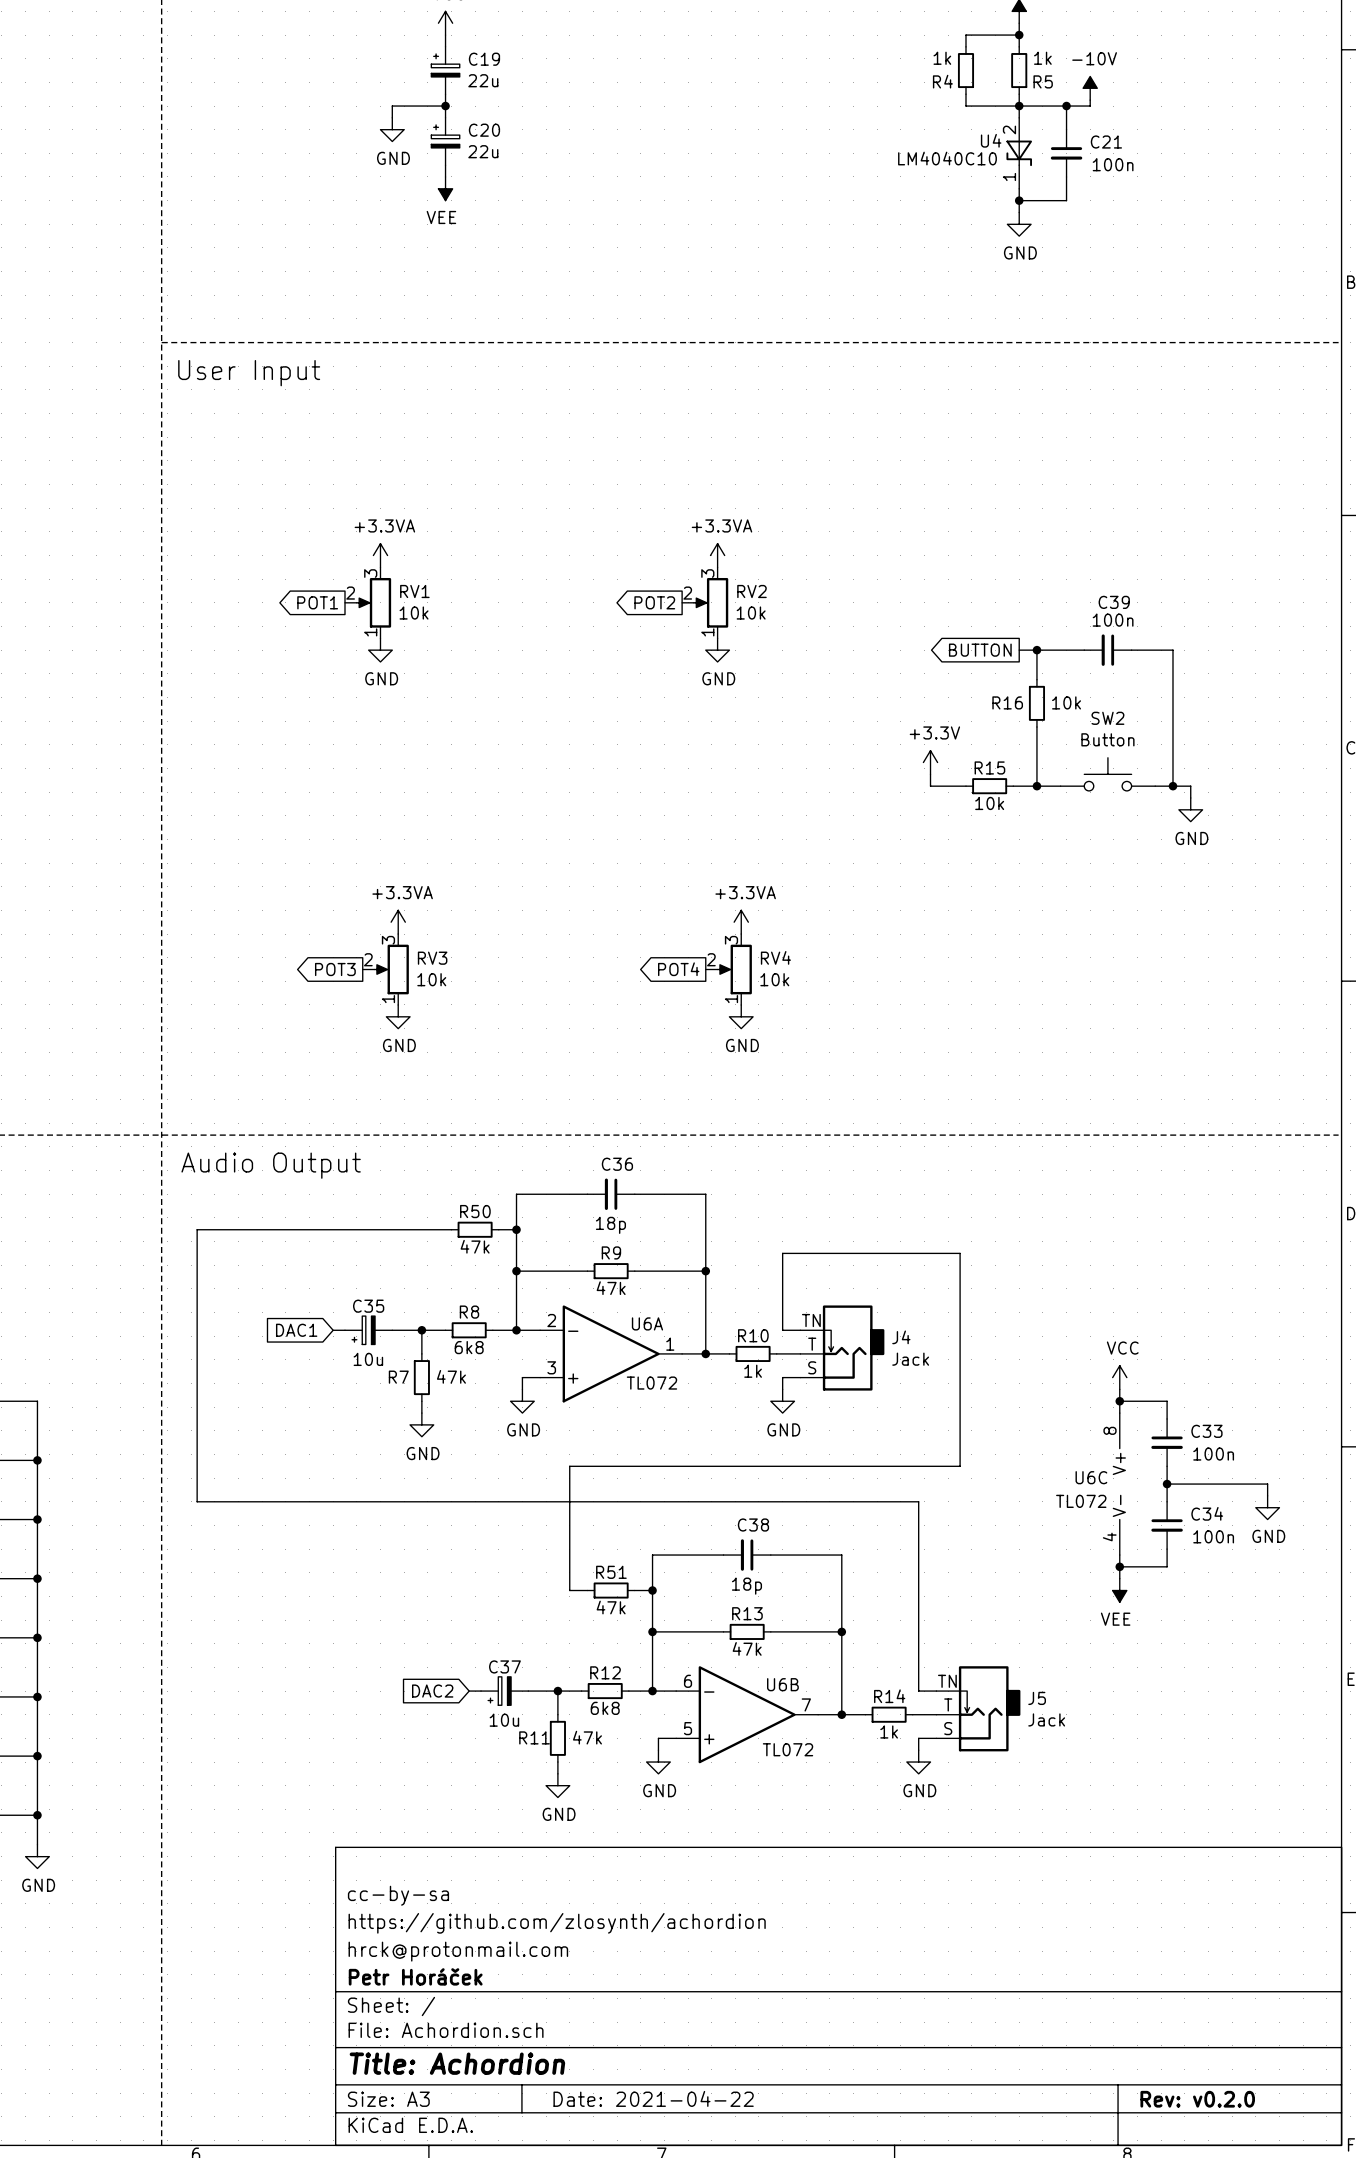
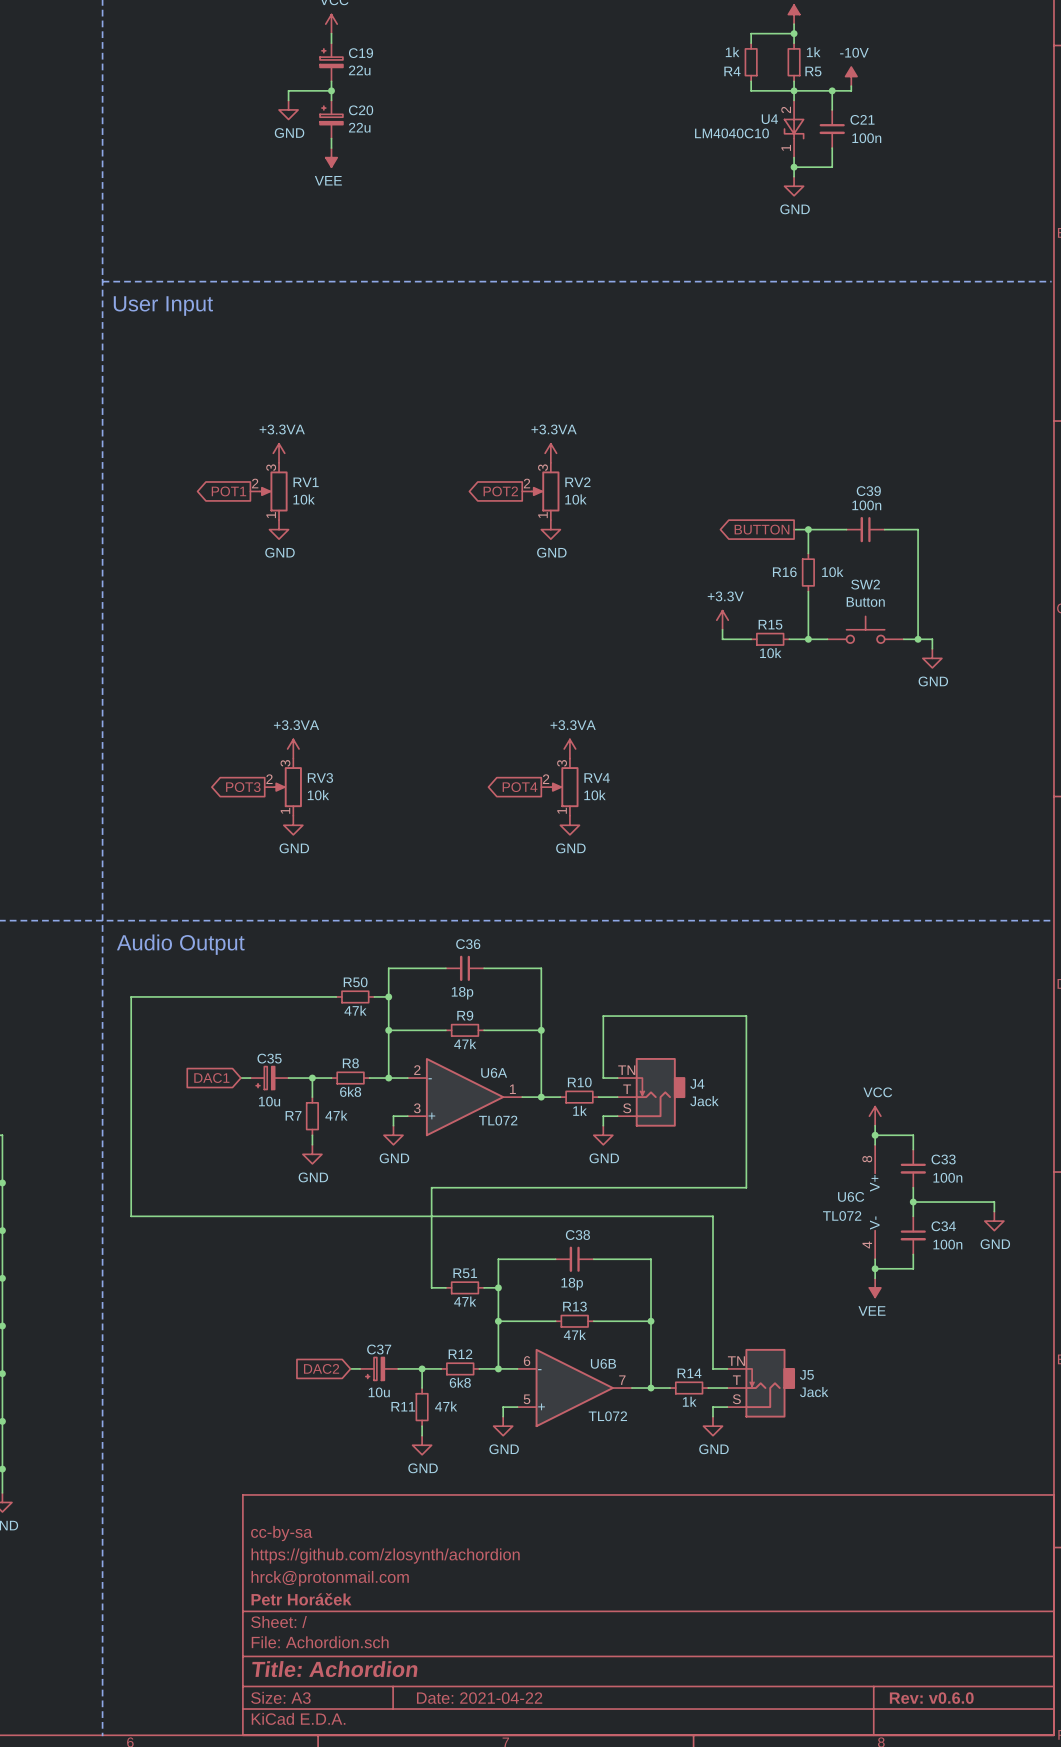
title block: Rev: v0.2.0 (1197, 2099) -> Rev: v0.6.0 (931, 1698)

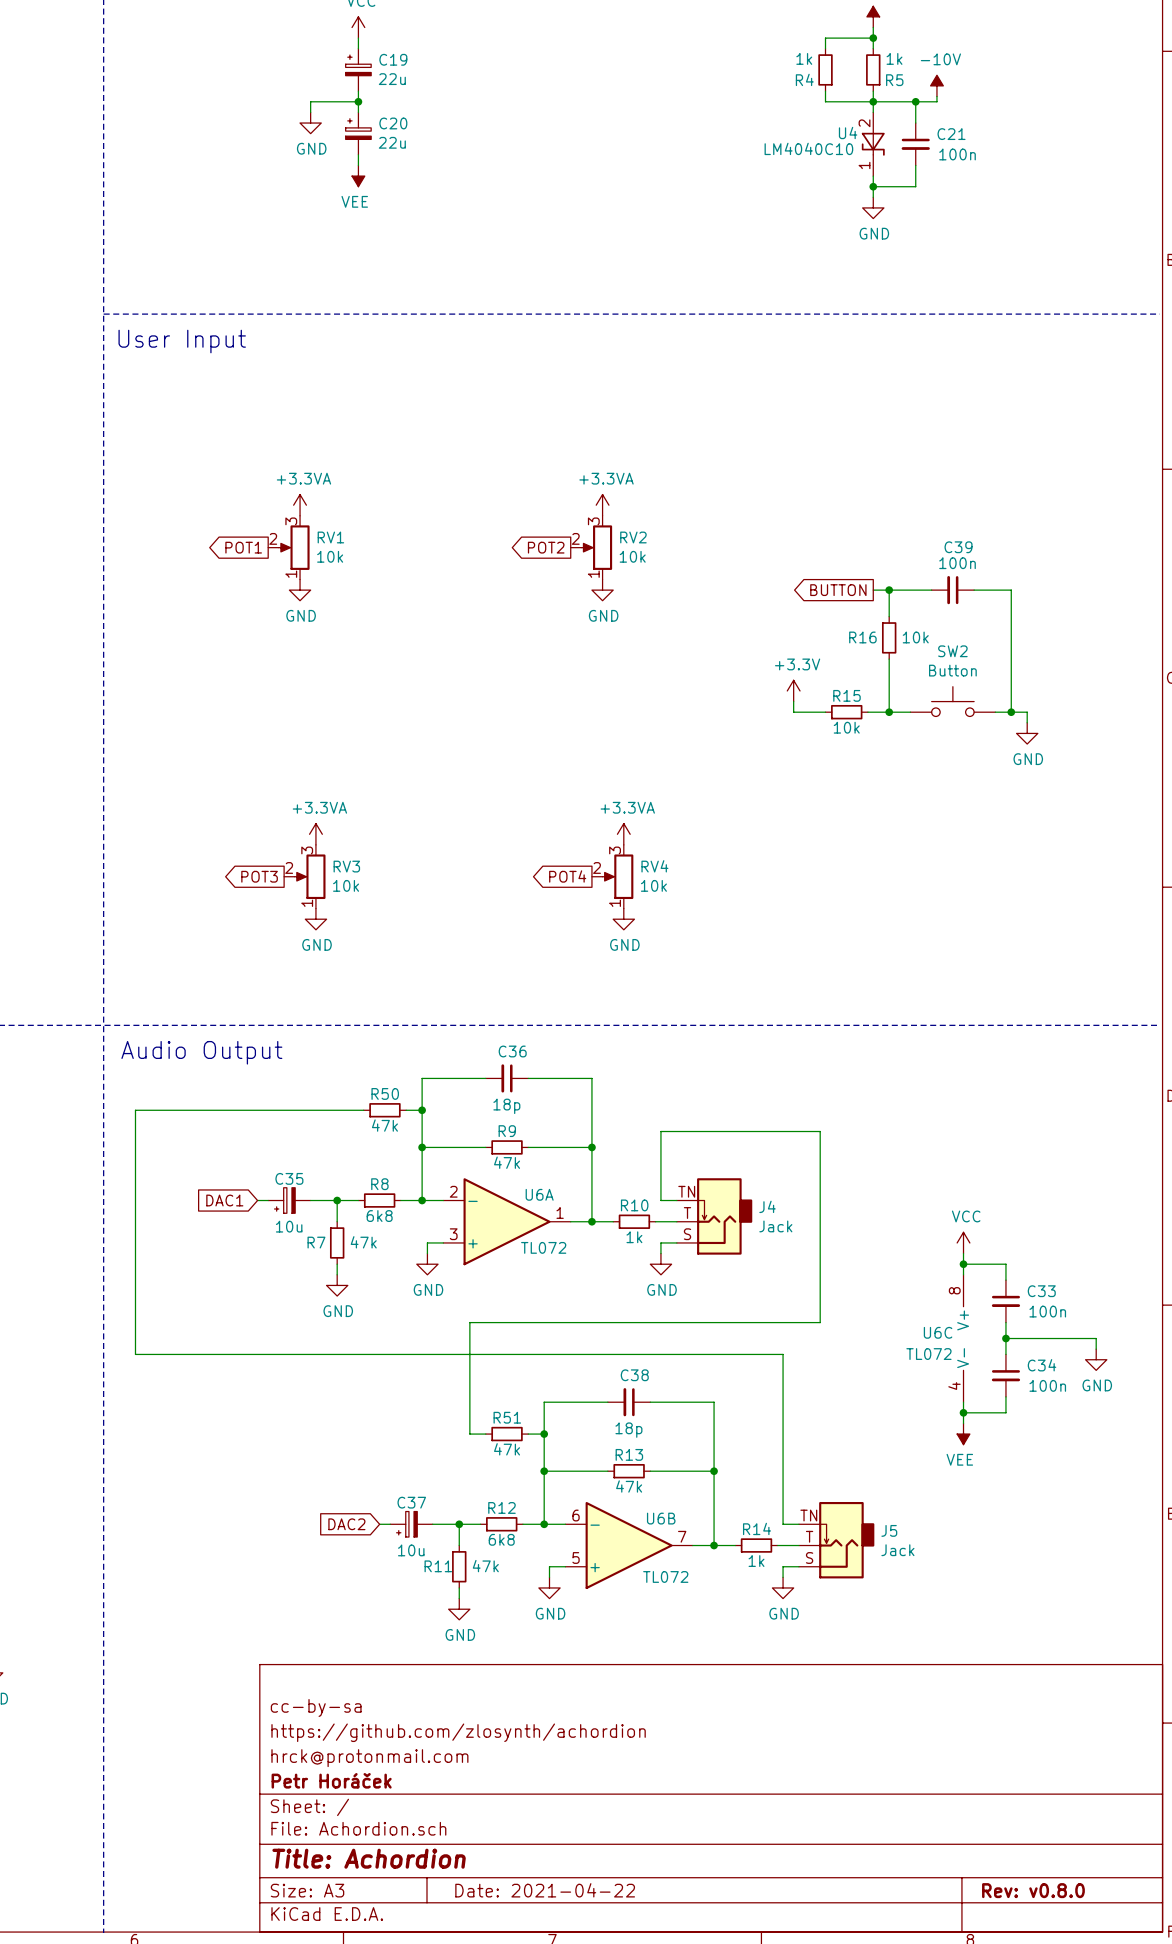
title block: Rev: v0.6.0 (931, 1698) -> Rev: v0.8.0 (1033, 1890)

